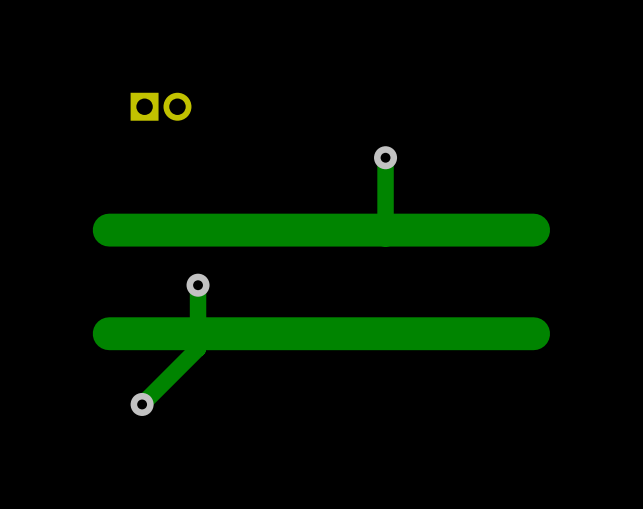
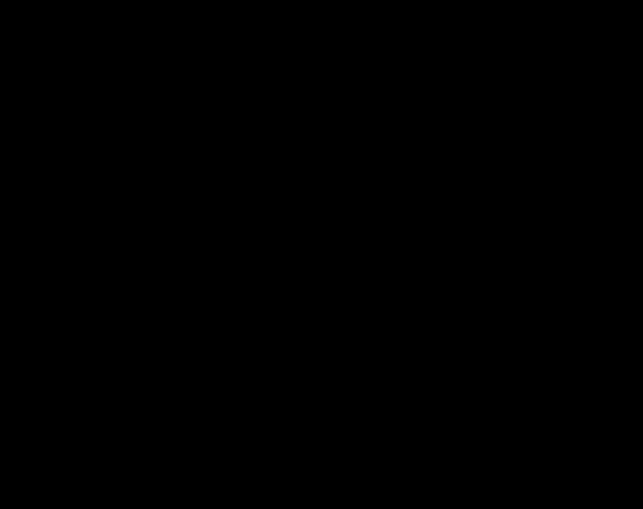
part: (161, 106) -> none
track: (385, 157) (385, 230) -> none
via: (385, 157) -> none
track: (533, 230) (109, 230) -> none
track: (198, 285) (198, 348) (142, 404) -> none
via: (198, 285) -> none
track: (533, 333) (109, 333) -> none
via: (142, 404) -> none

